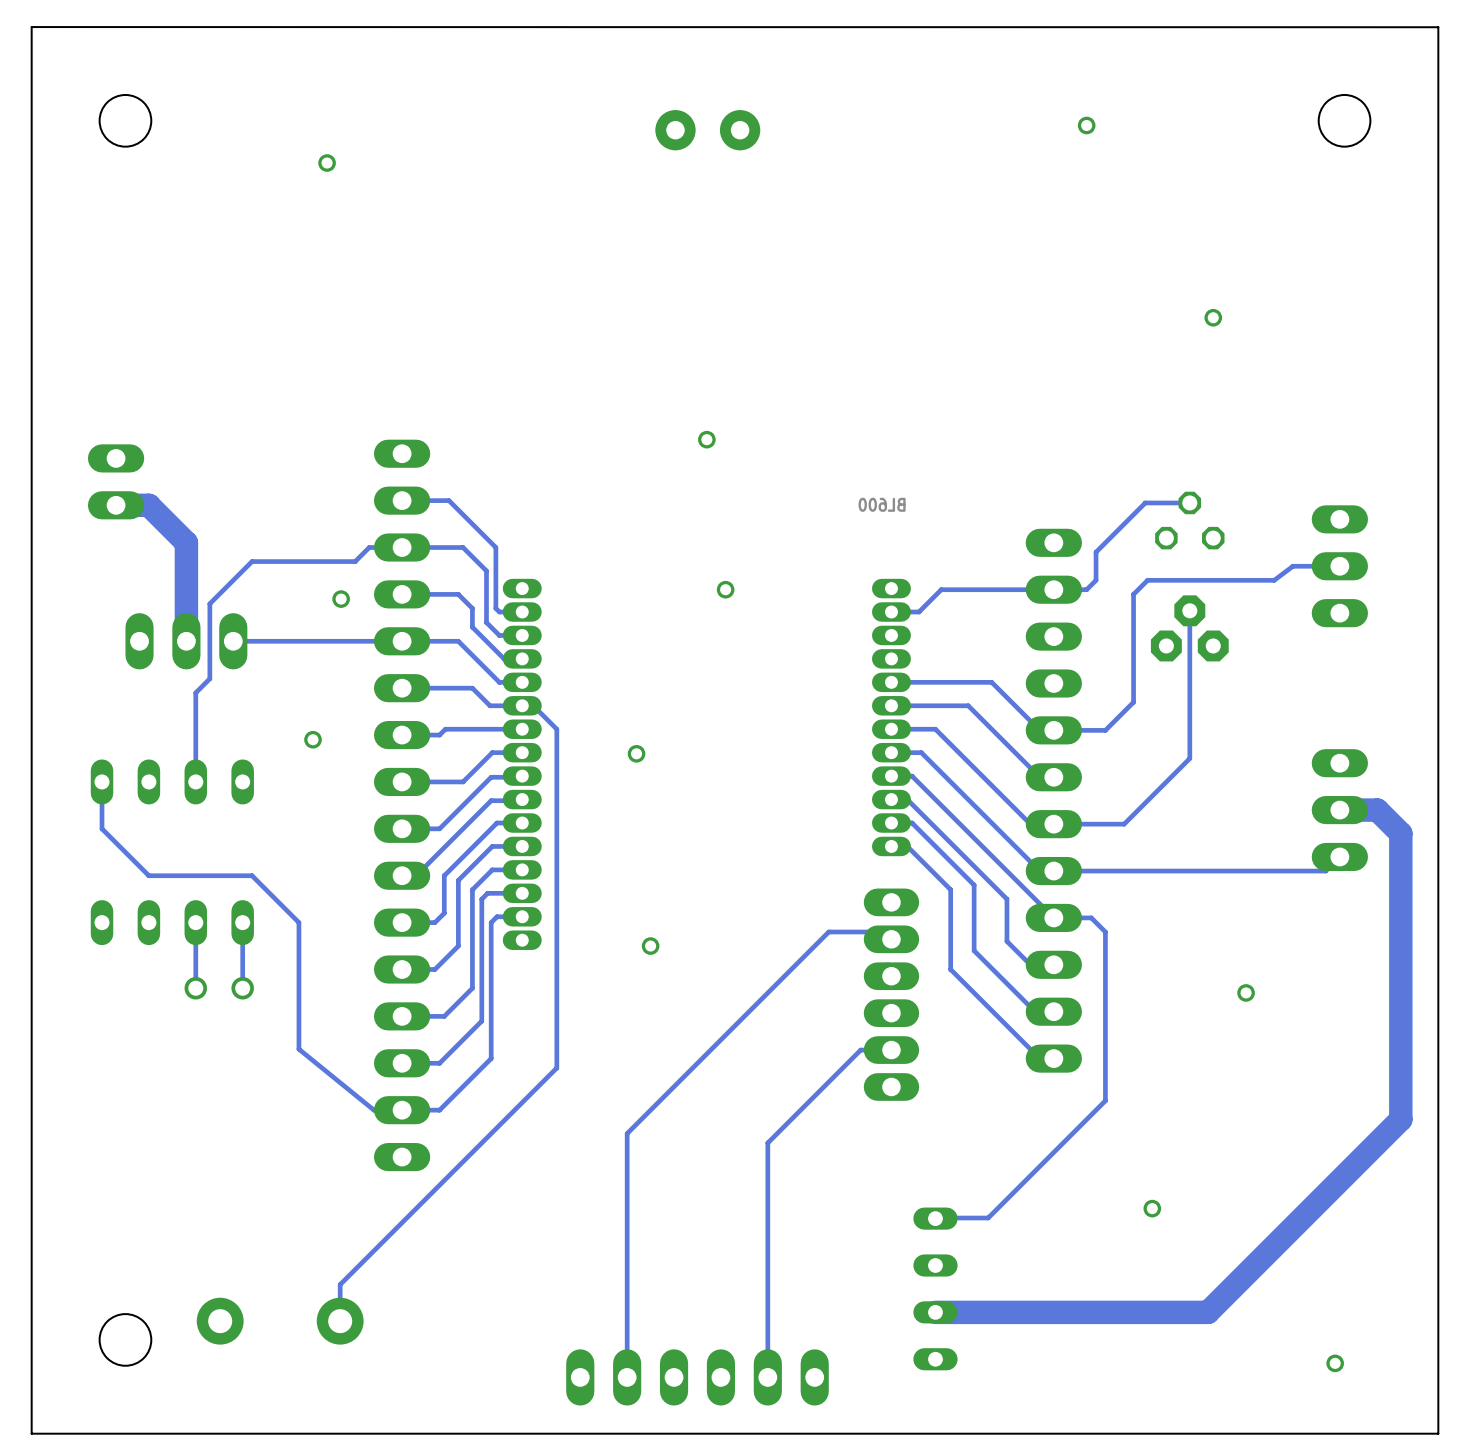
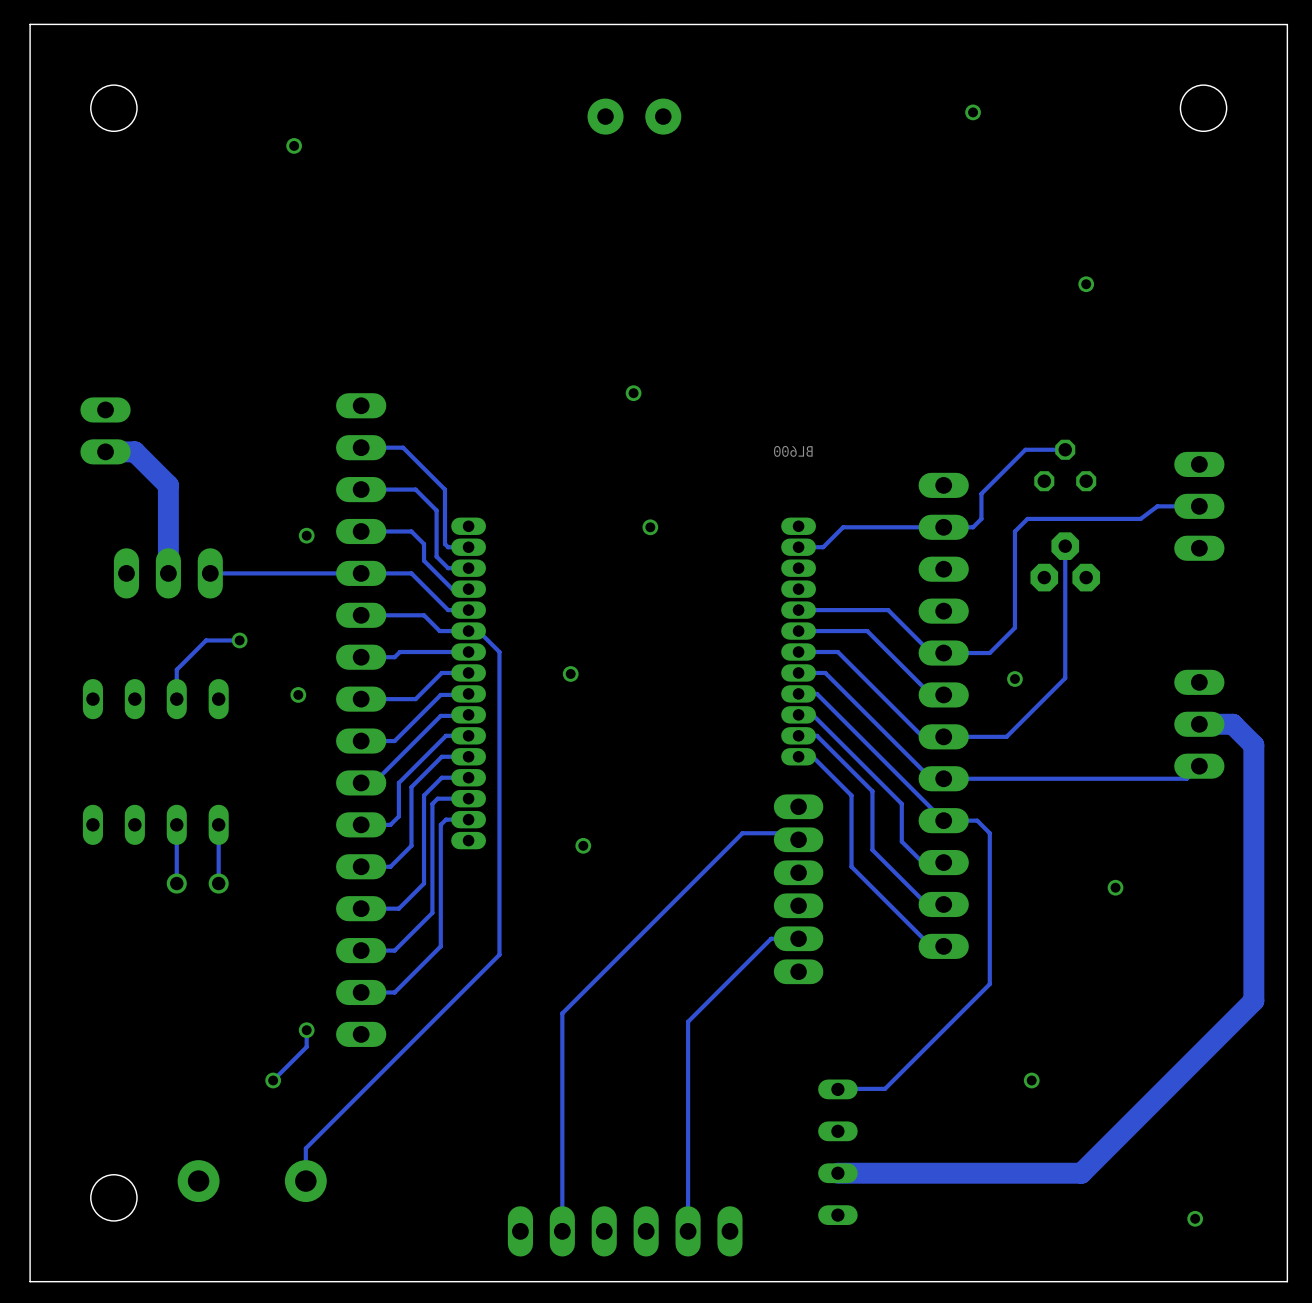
track: (402, 547) (369, 547) (355, 561) (252, 561) (209, 603) (209, 678) (195, 692) (195, 749) -> (239, 640) (206, 640) (176, 669)
via: none -> (239, 640)
via: (313, 739) -> none
via: none -> (1014, 679)
via: none -> (298, 694)
track: (102, 781) (102, 828) (148, 875) (252, 875) (298, 922) (298, 1049) (373, 1110) (402, 1110) -> none
track: none -> (306, 1030) (306, 1046) (273, 1080)
via: none -> (306, 1030)
via: none -> (273, 1080)

